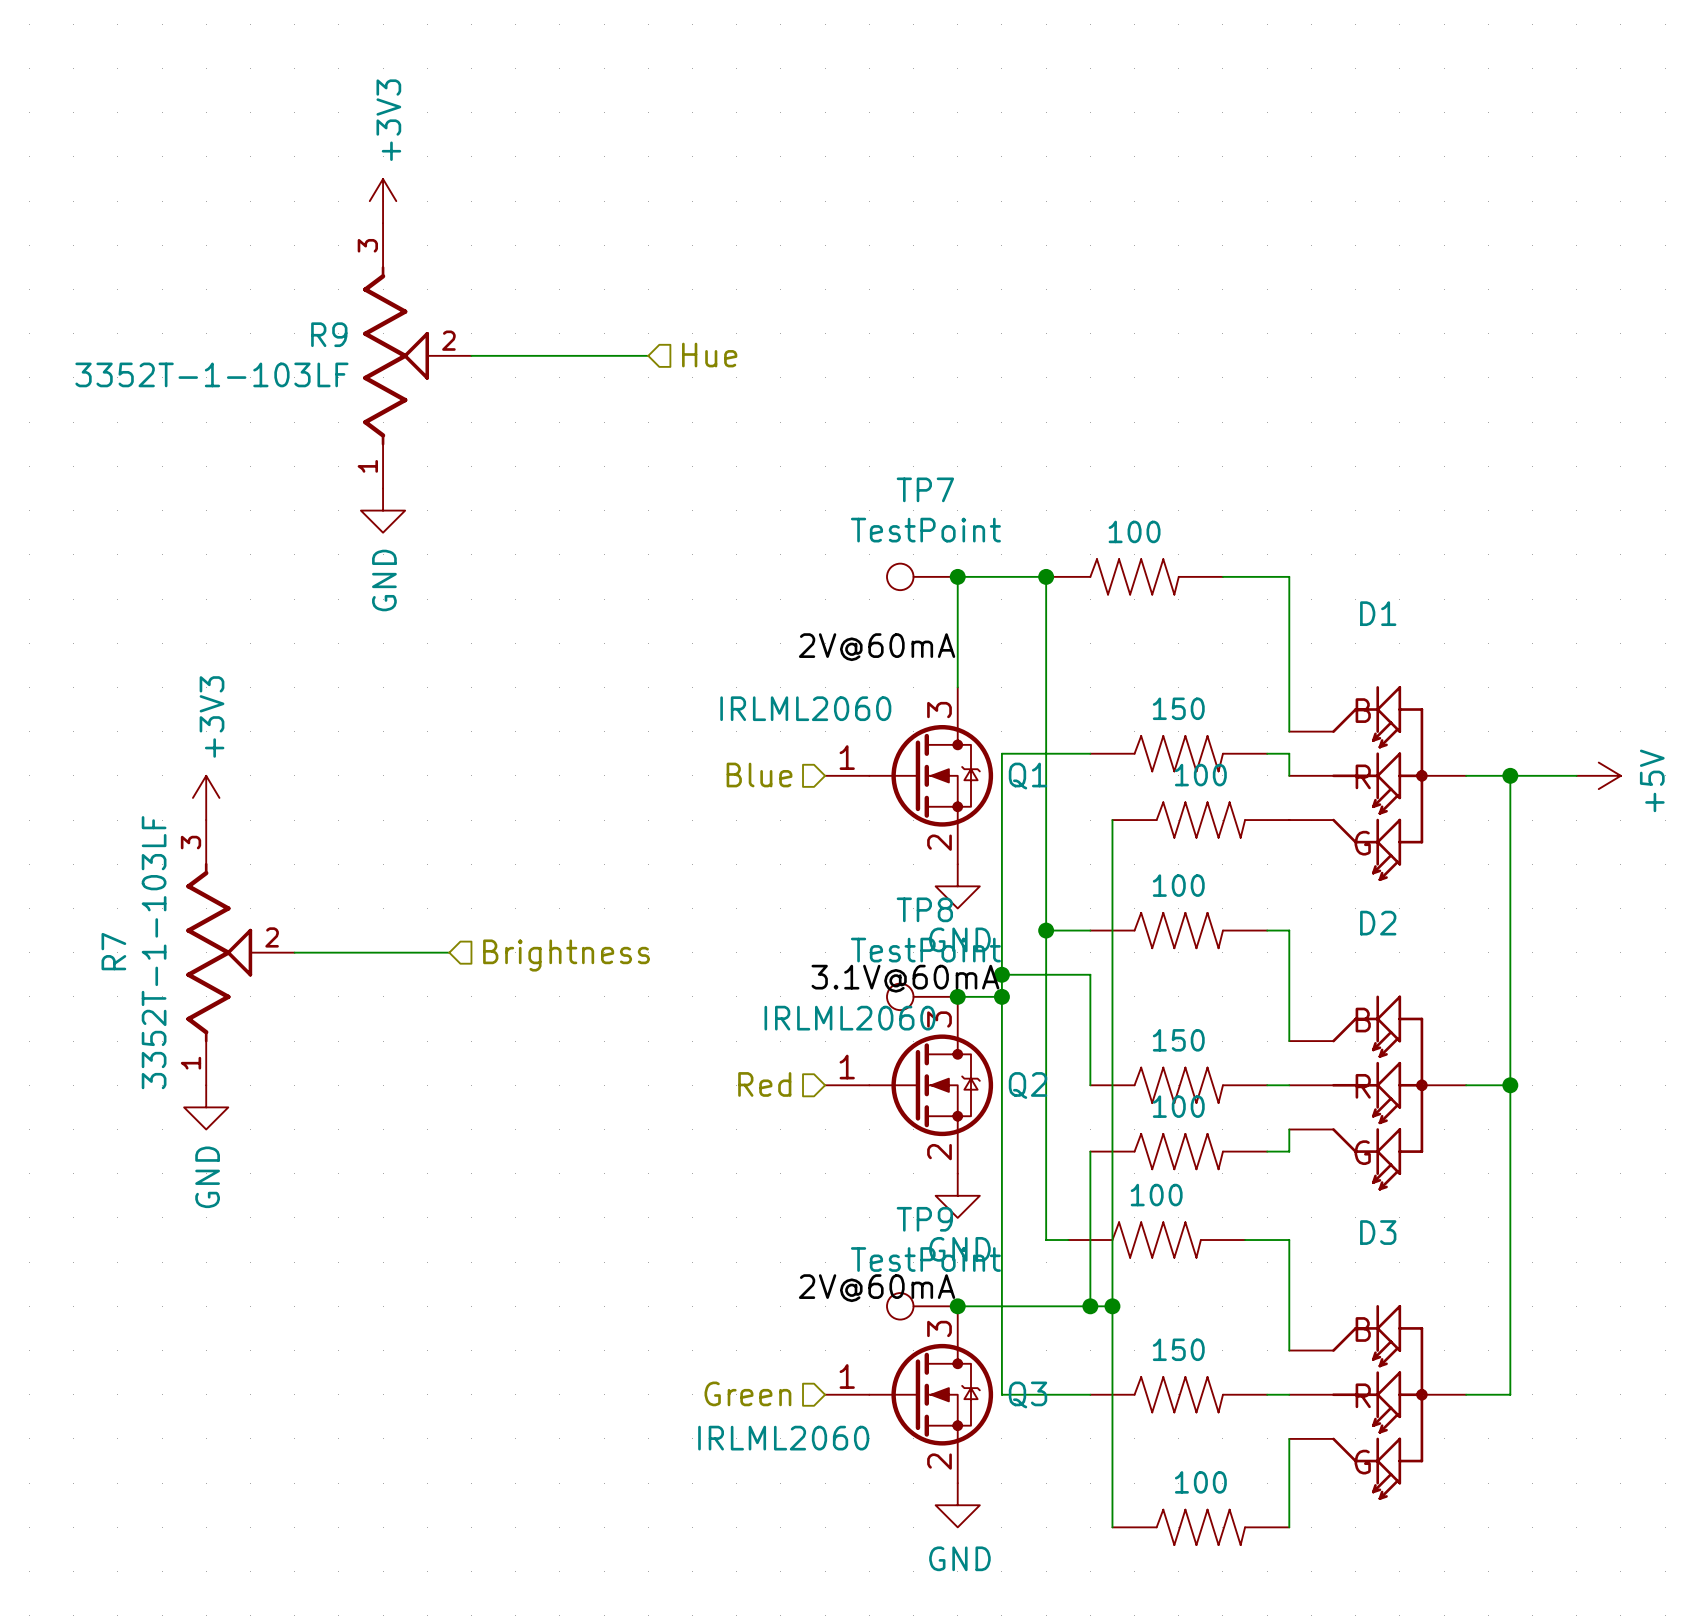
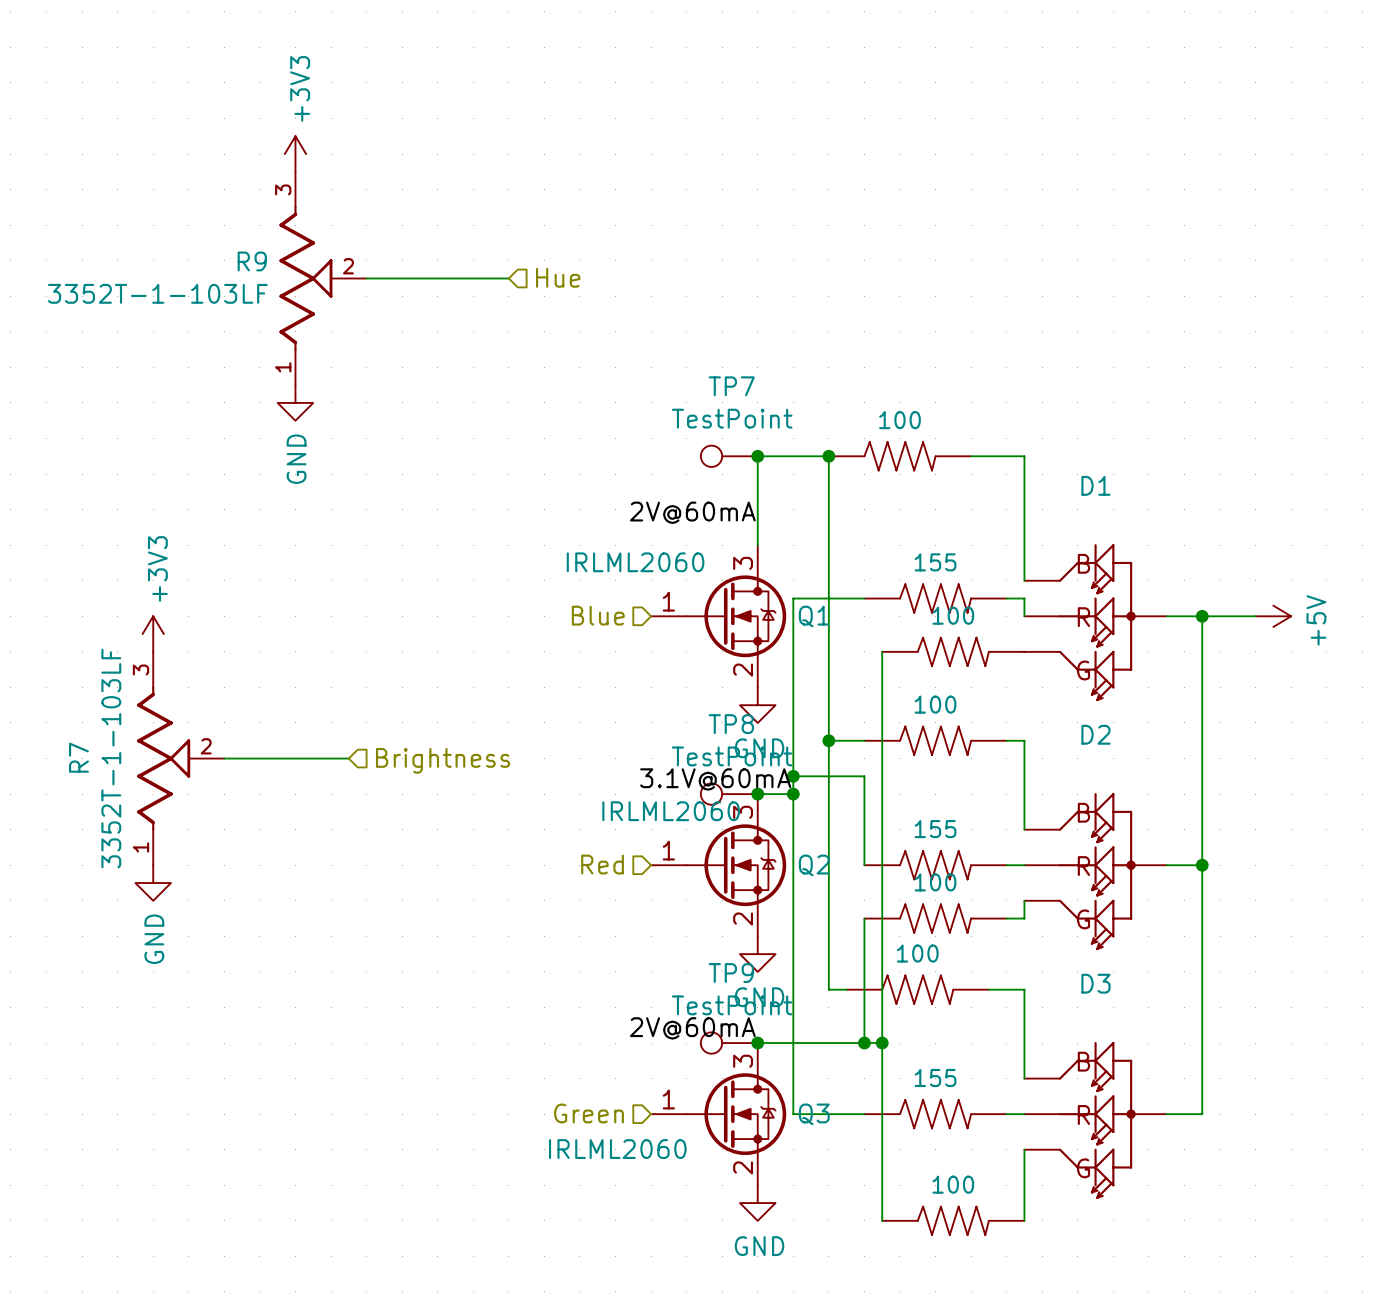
part value: 150 (1178, 708) -> 155 (935, 562)
part value: 150 (1178, 1040) -> 155 (935, 829)
part value: 150 (1178, 1349) -> 155 (935, 1077)

